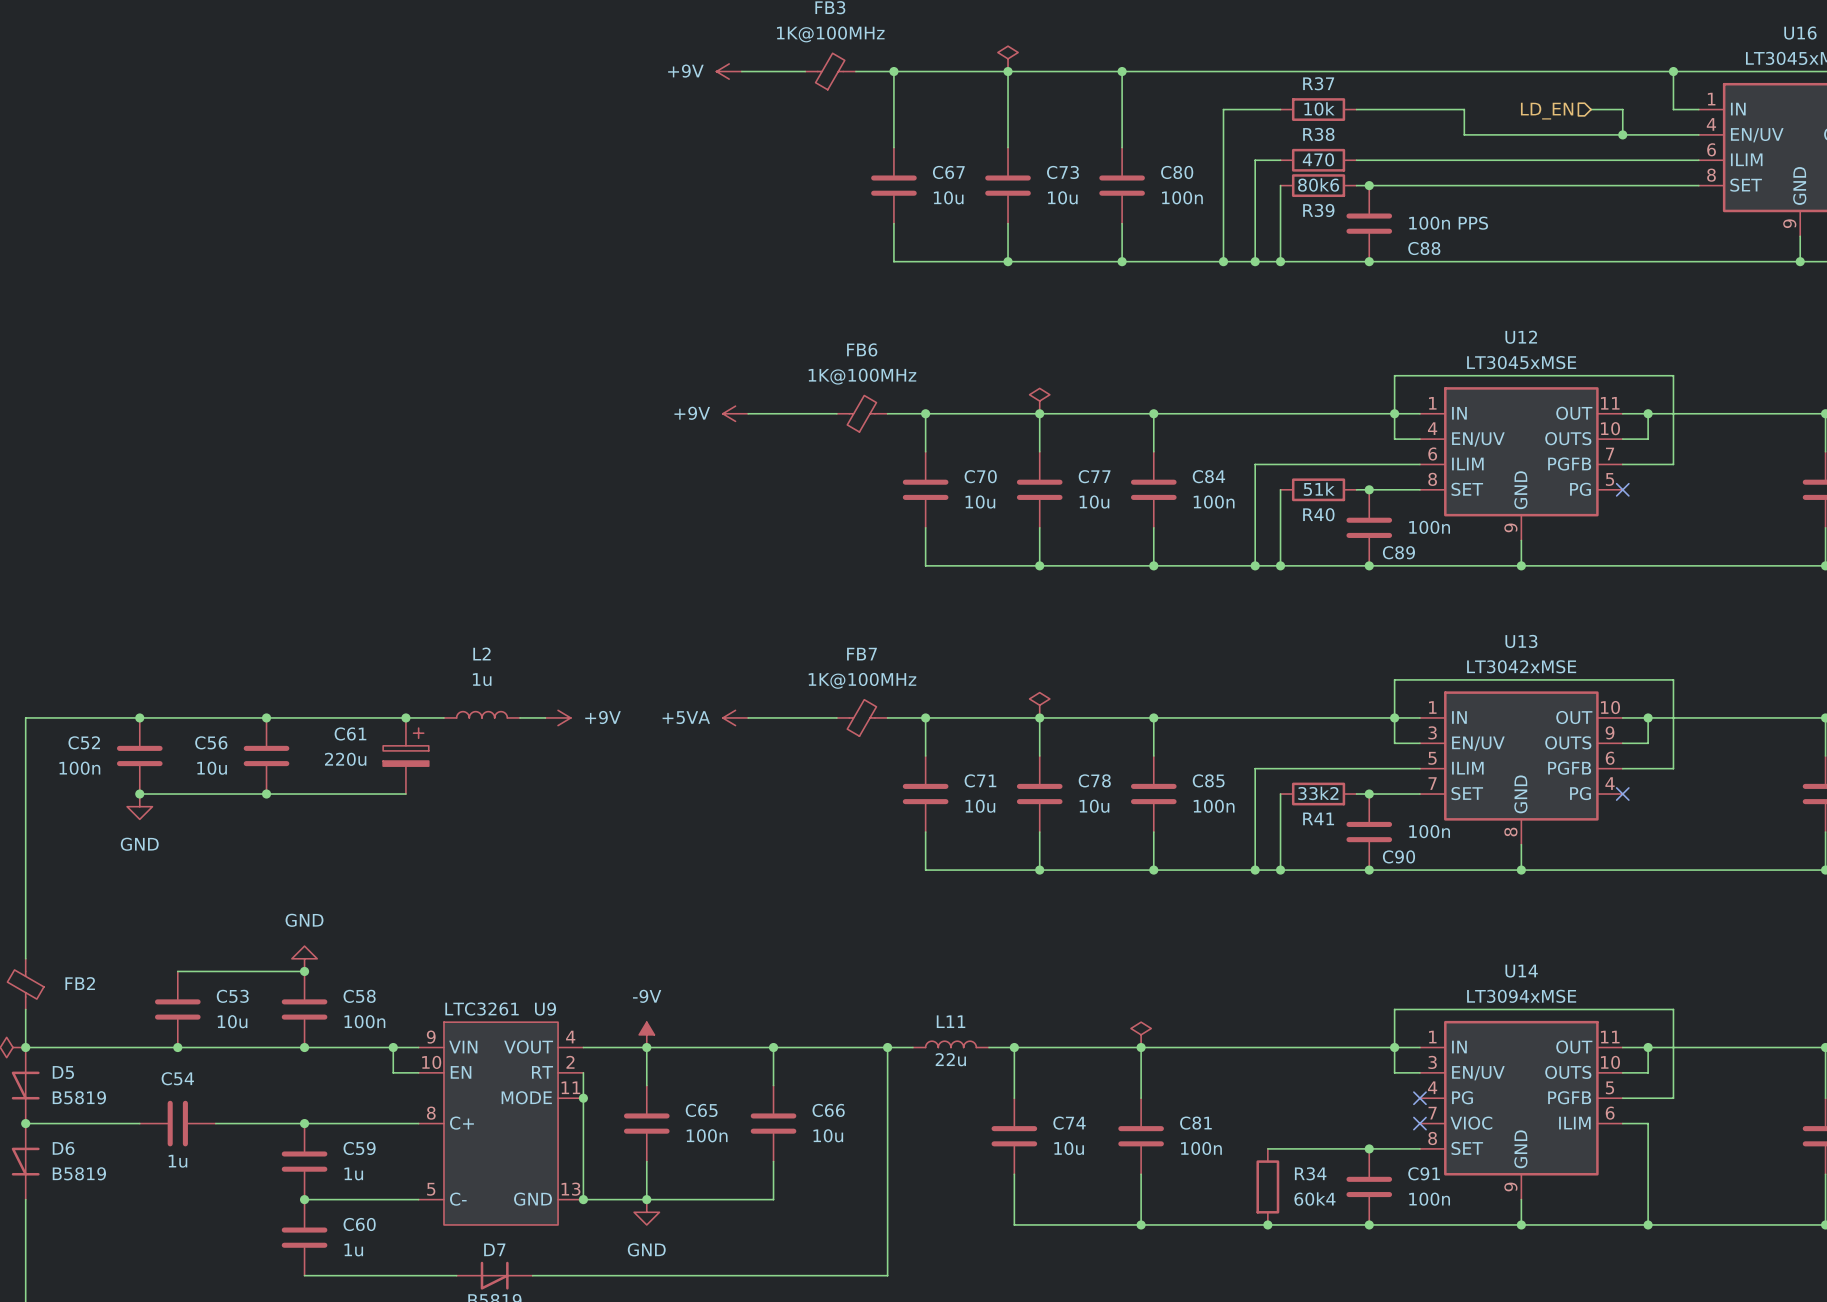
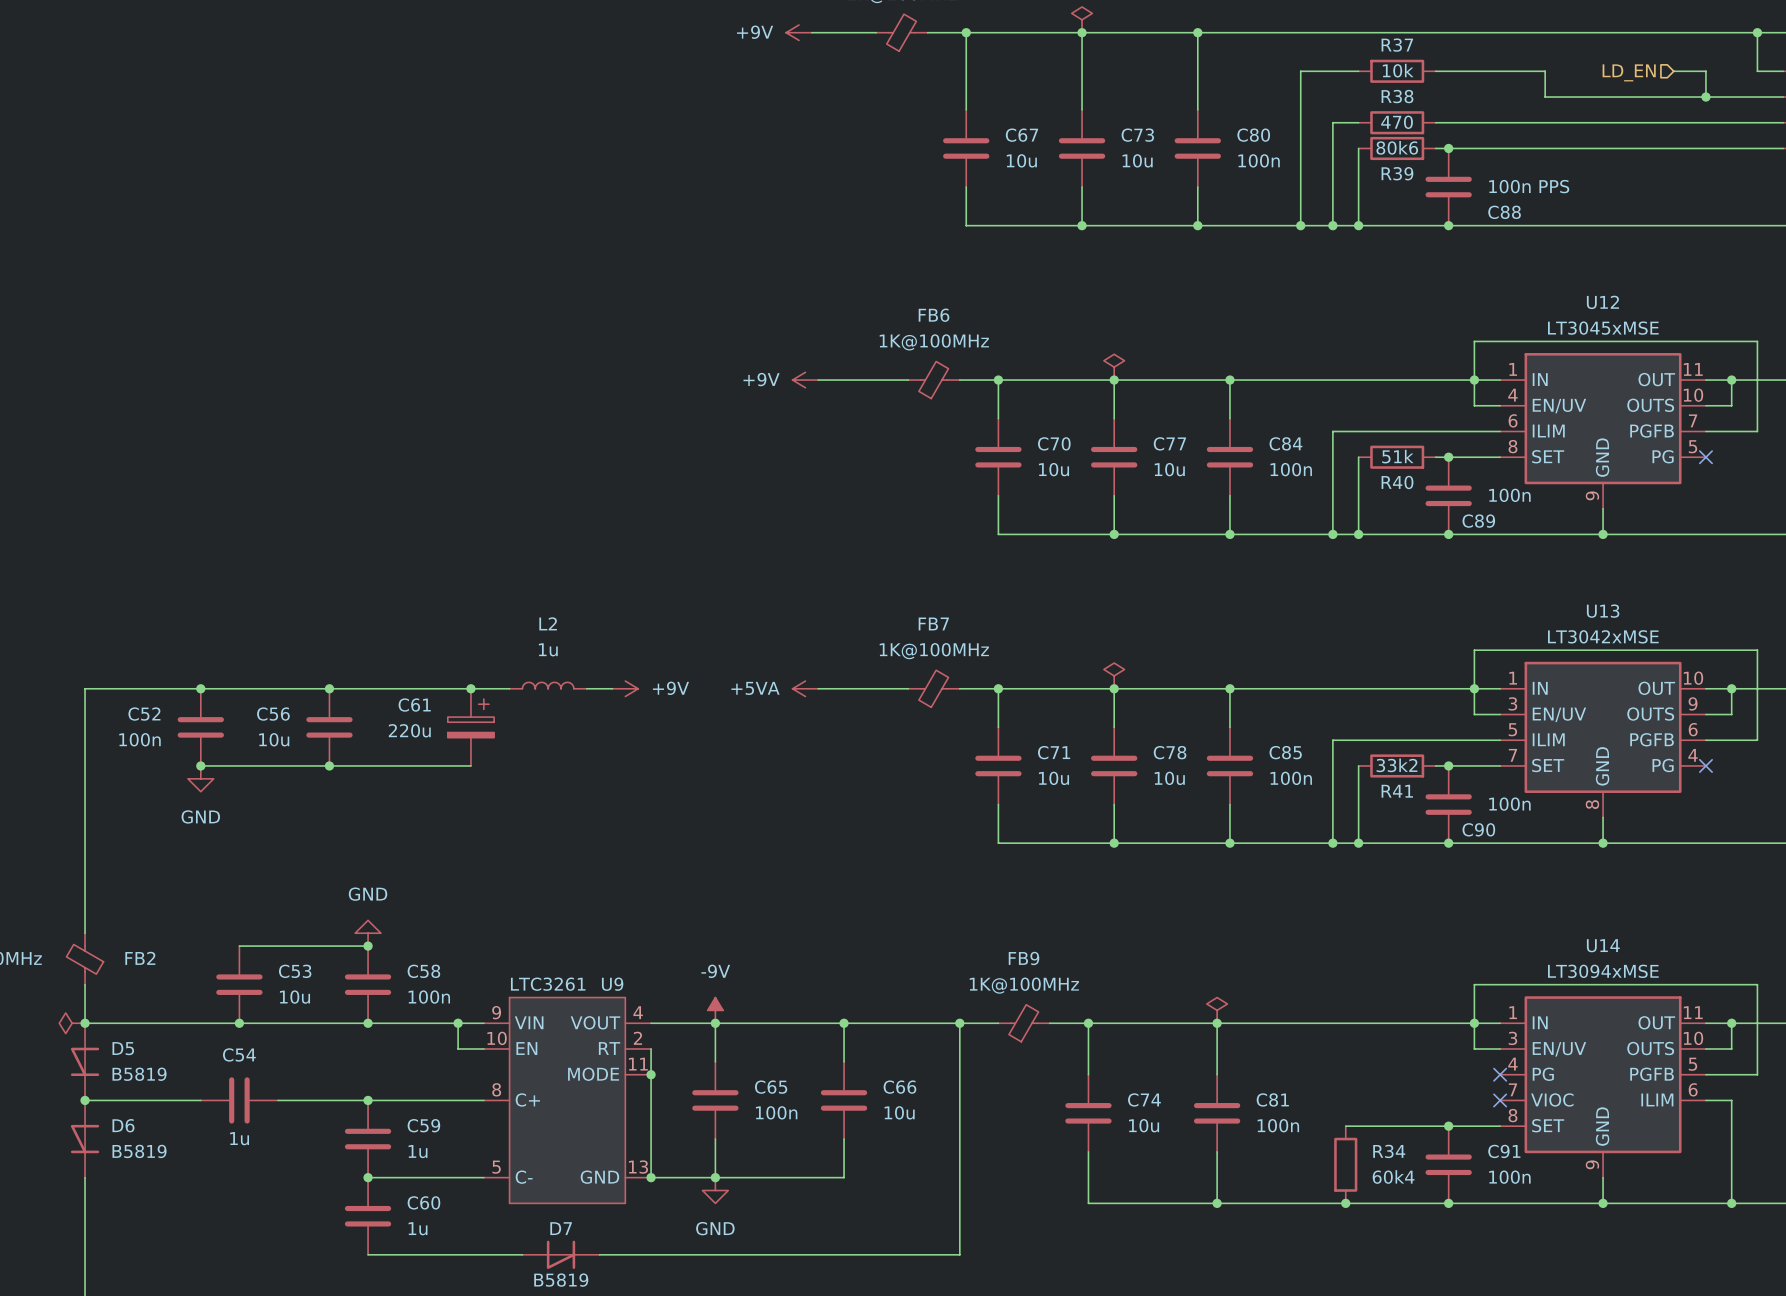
L11: 22u (950, 1044) -> none
FB9: none -> 1K@100MHz (1024, 1023)

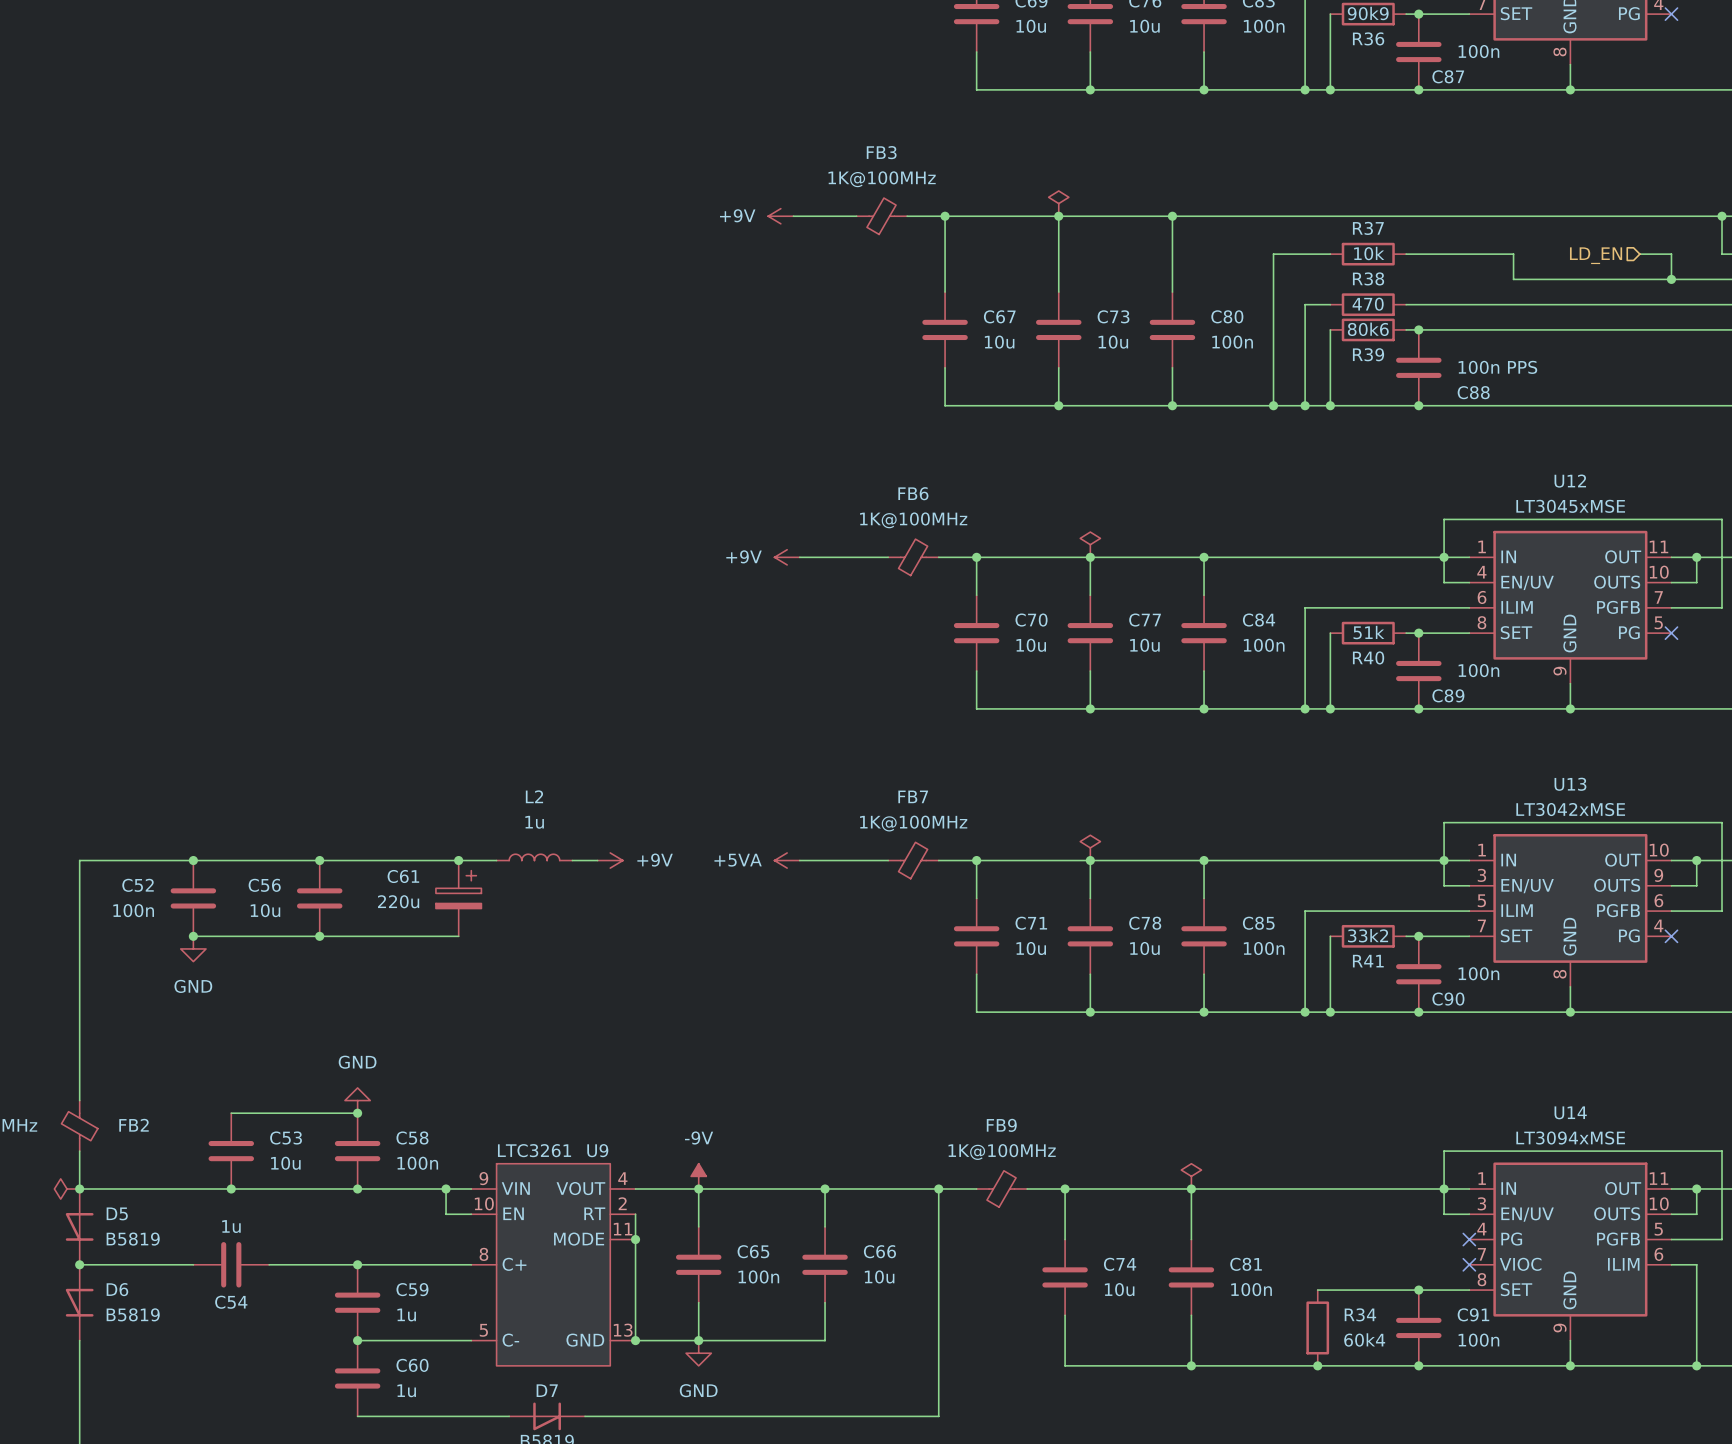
C54 name position: C54 (239, 1054) -> C54 (231, 1302)
C54 value position: 1u (239, 1138) -> 1u (231, 1226)

